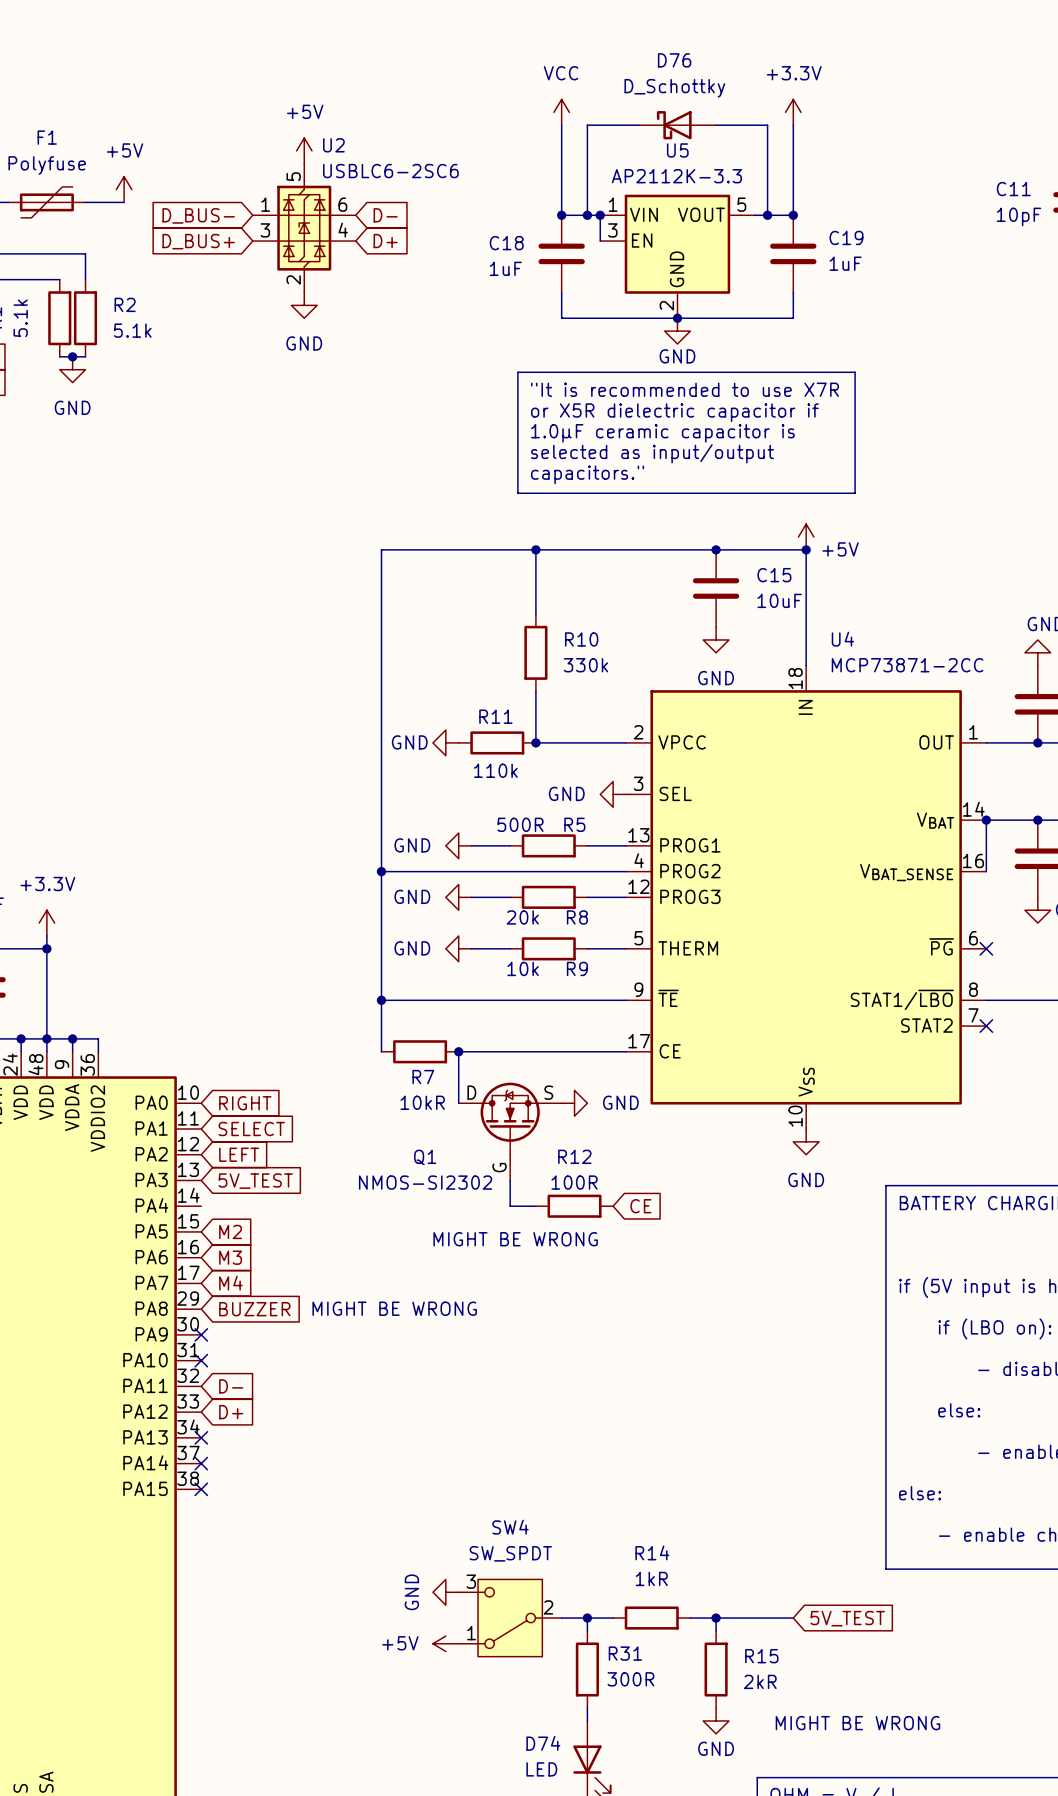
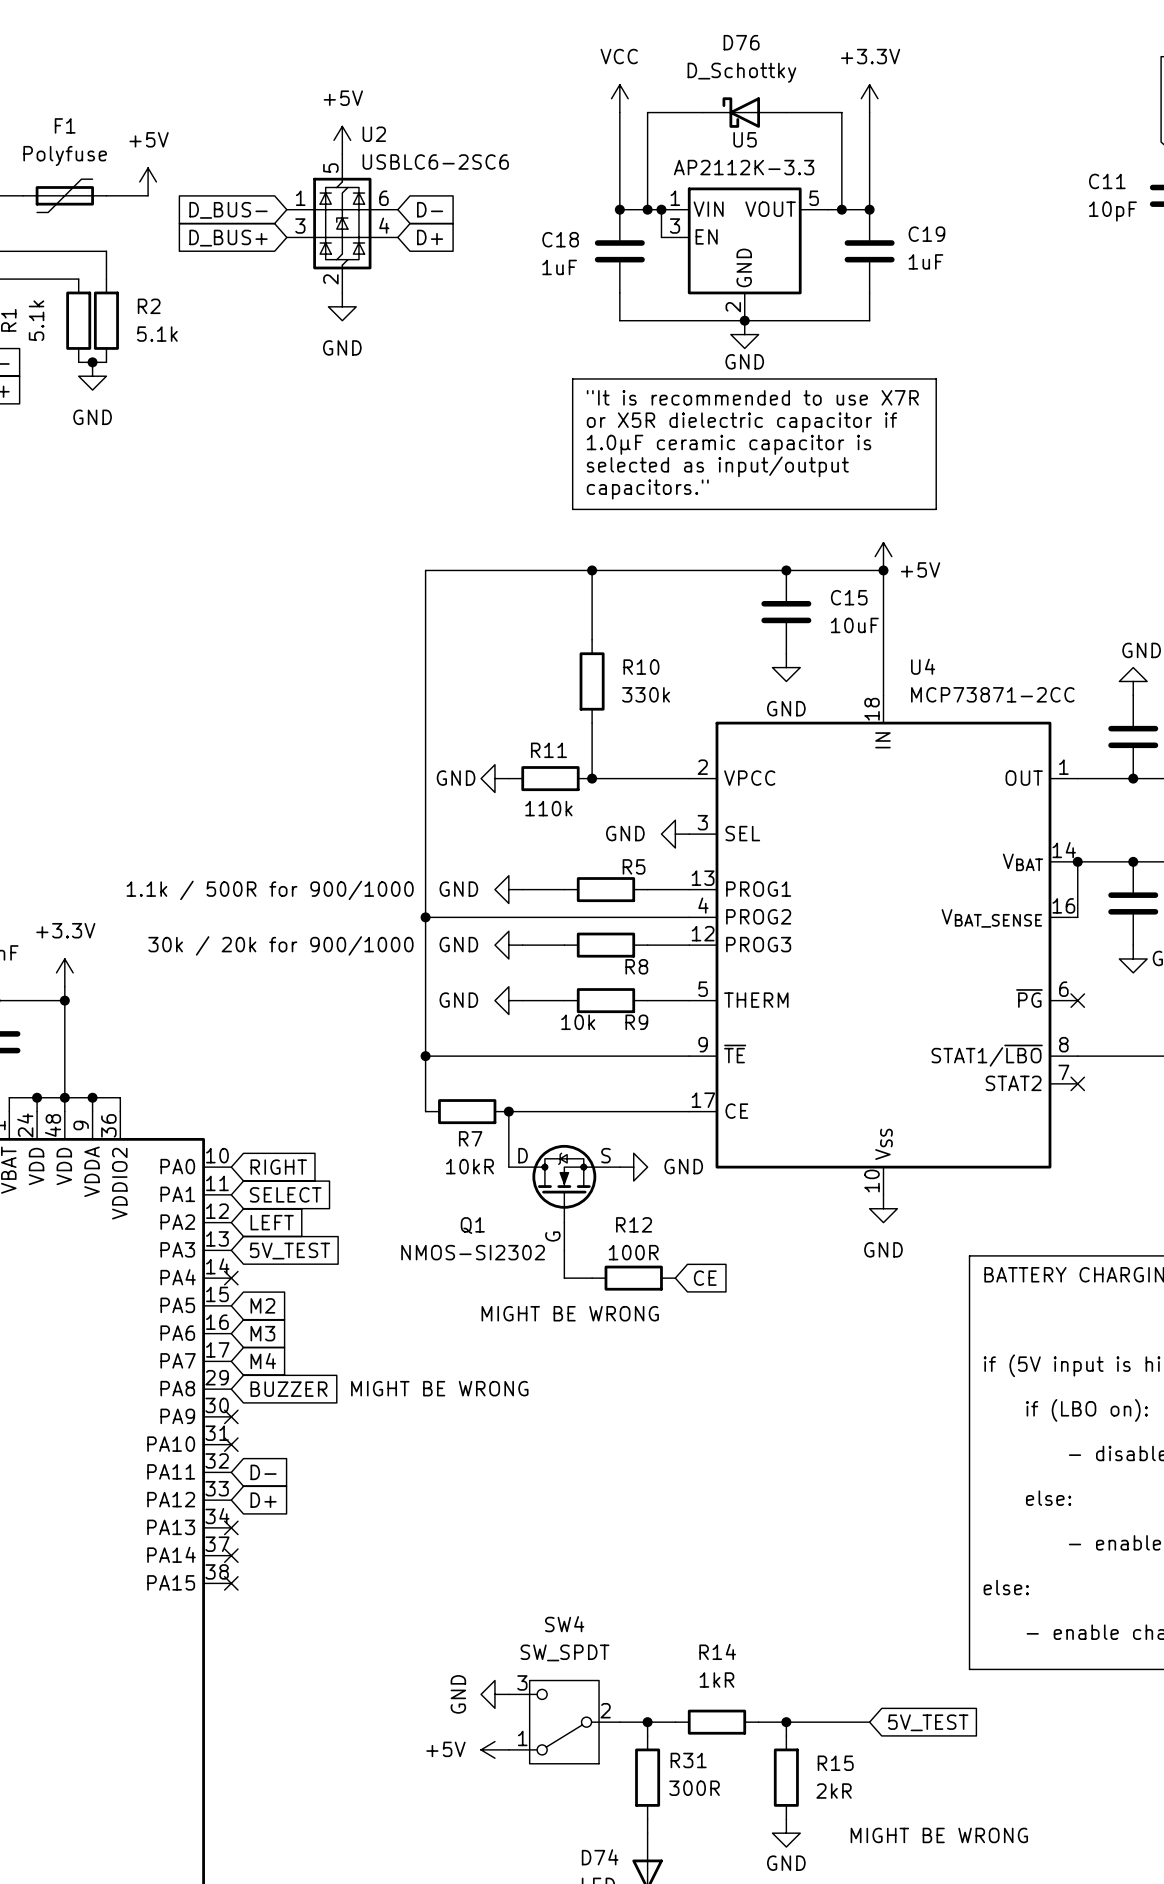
R5 value: 500R (520, 824) -> 1.1k / 500R for 900/1000 (270, 890)
R8 value: 20k (522, 917) -> 30k / 20k for 900/1000 (280, 945)
no-connect mark: none -> (231, 1278)

